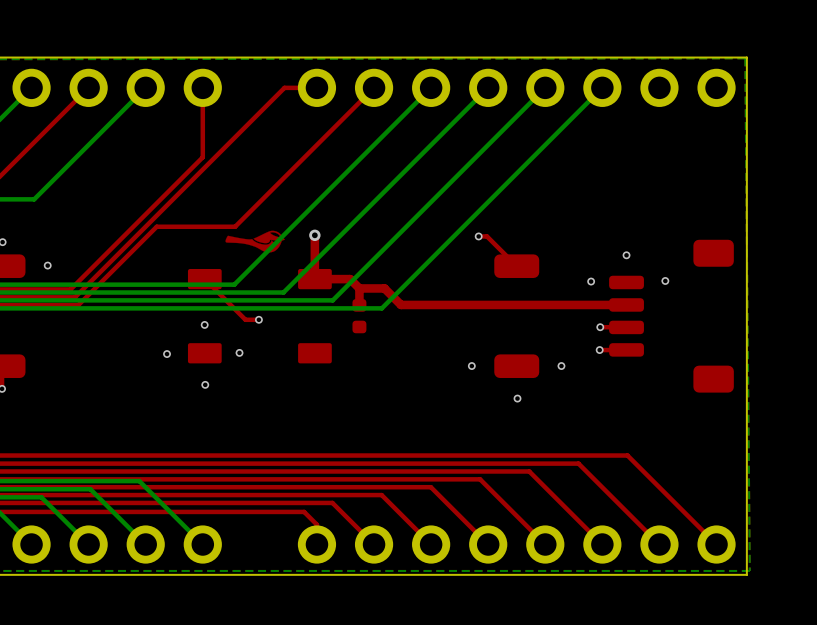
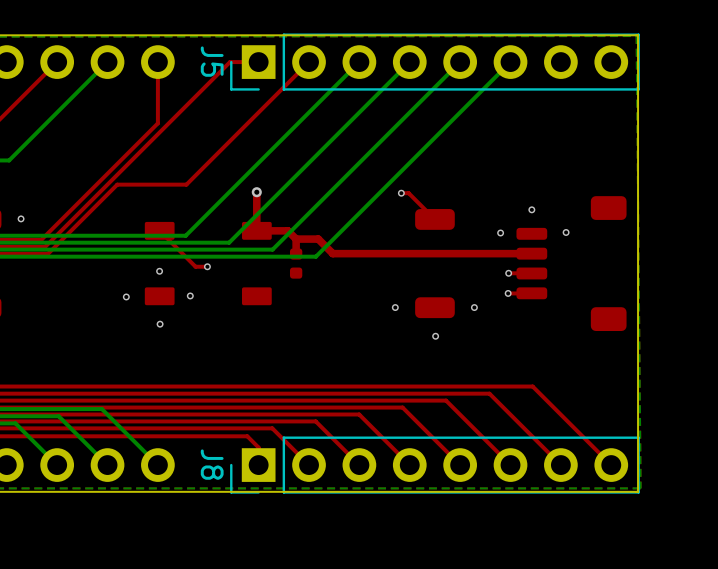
part: (516, 87) -> none
J5: none -> (434, 62)
drawing: [225, 230, 285, 253] -> none
part: (516, 544) -> none
J8: none -> (434, 465)

